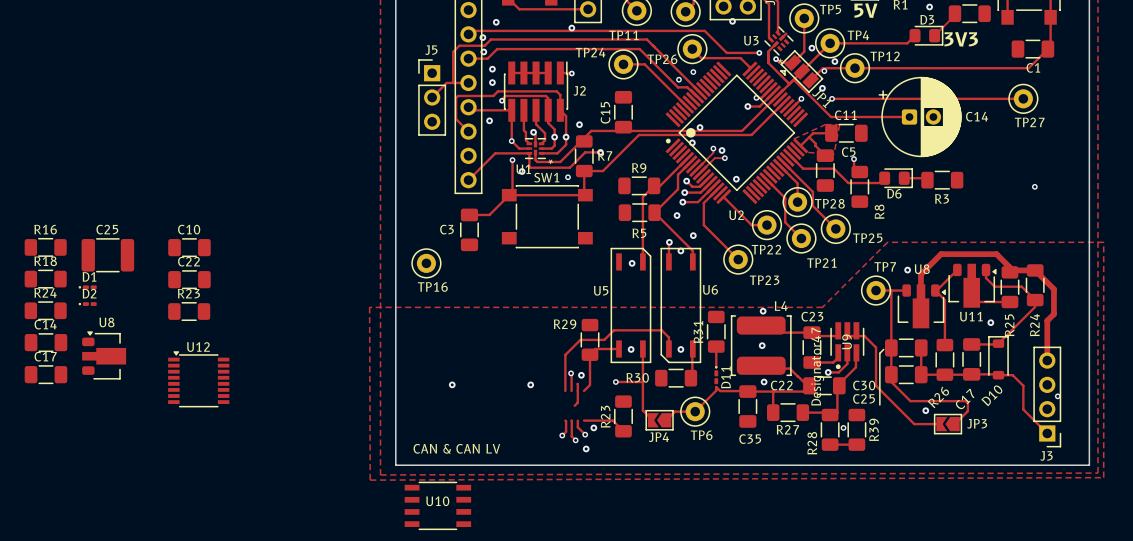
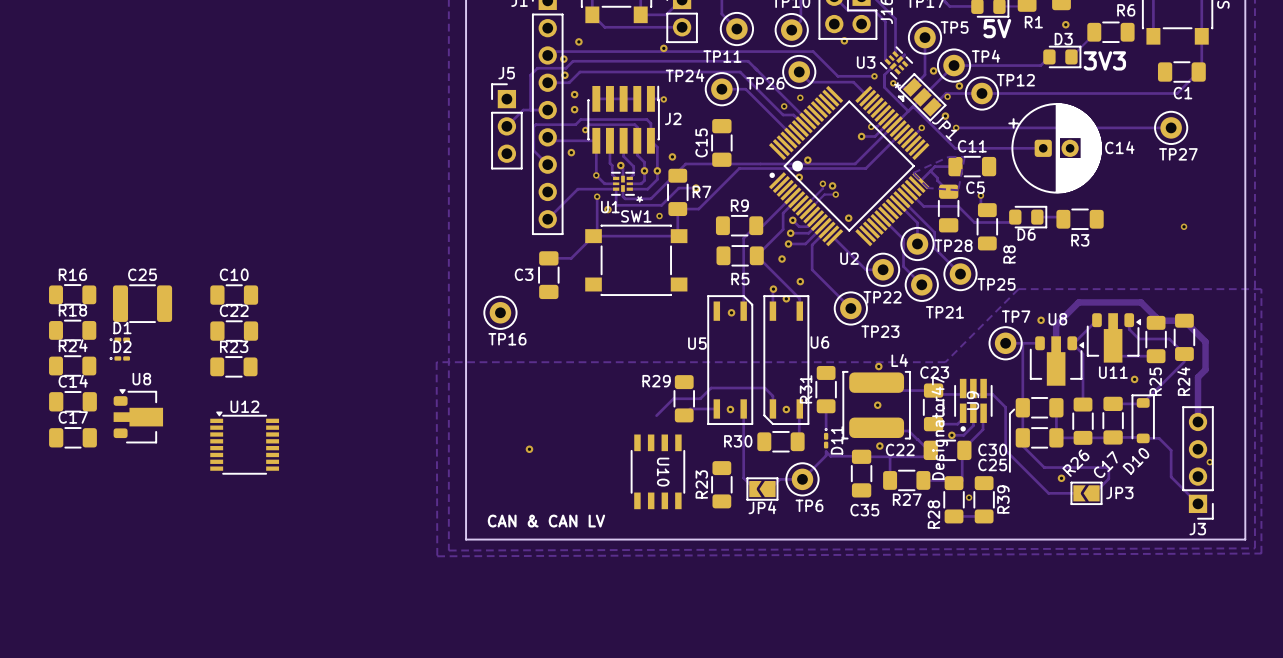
track: (565, 354) (565, 390) -> none
track: (590, 354) (590, 384) (584, 390) -> none
track: (571, 373) (571, 390) -> none
via: (571, 373) -> none
via: (581, 375) -> none
track: (615, 382) (642, 382) -> none
via: (615, 382) -> none
track: (577, 383) (577, 402) (574, 405) -> none
via: (530, 384) -> none
track: (565, 420) (566, 431) (562, 435) -> none
track: (571, 420) (571, 436) (575, 440) -> none
track: (577, 420) (577, 427) (585, 434) -> none
track: (584, 420) (612, 420) (623, 431) -> none
via: (593, 427) -> none
via: (585, 434) -> none
via: (562, 435) -> none
via: (575, 440) -> none
via: (586, 448) -> none
U10 rotation: 0° (437, 505) -> 90° clockwise (657, 471)
U10 position: (437, 505) -> (657, 471)

